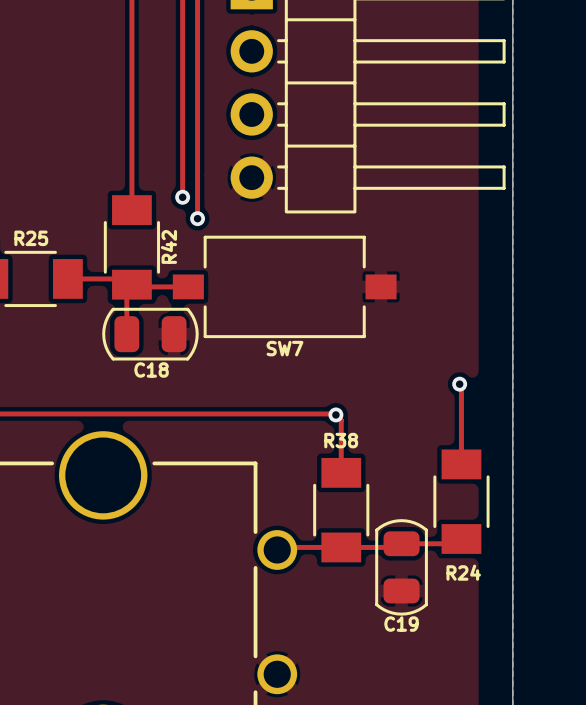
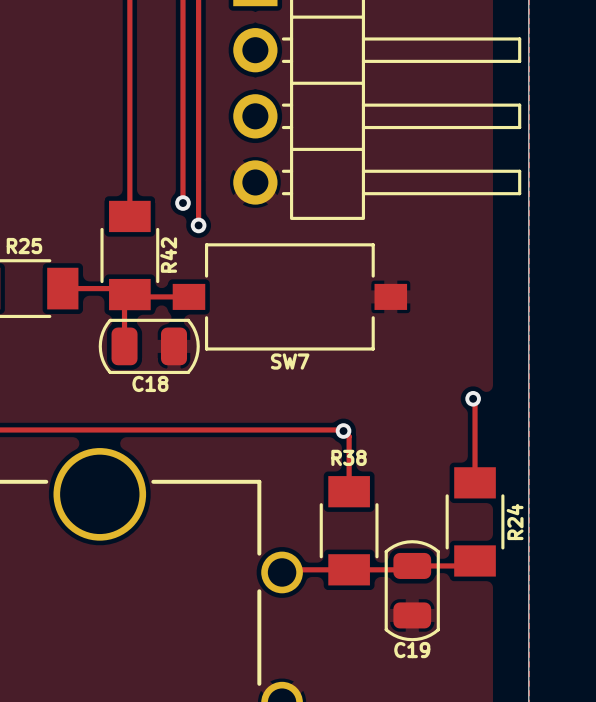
R24 name rotation: 0° (463, 572) -> 90° counterclockwise (515, 522)
R24 name position: R24 (463, 572) -> R24 (515, 522)

